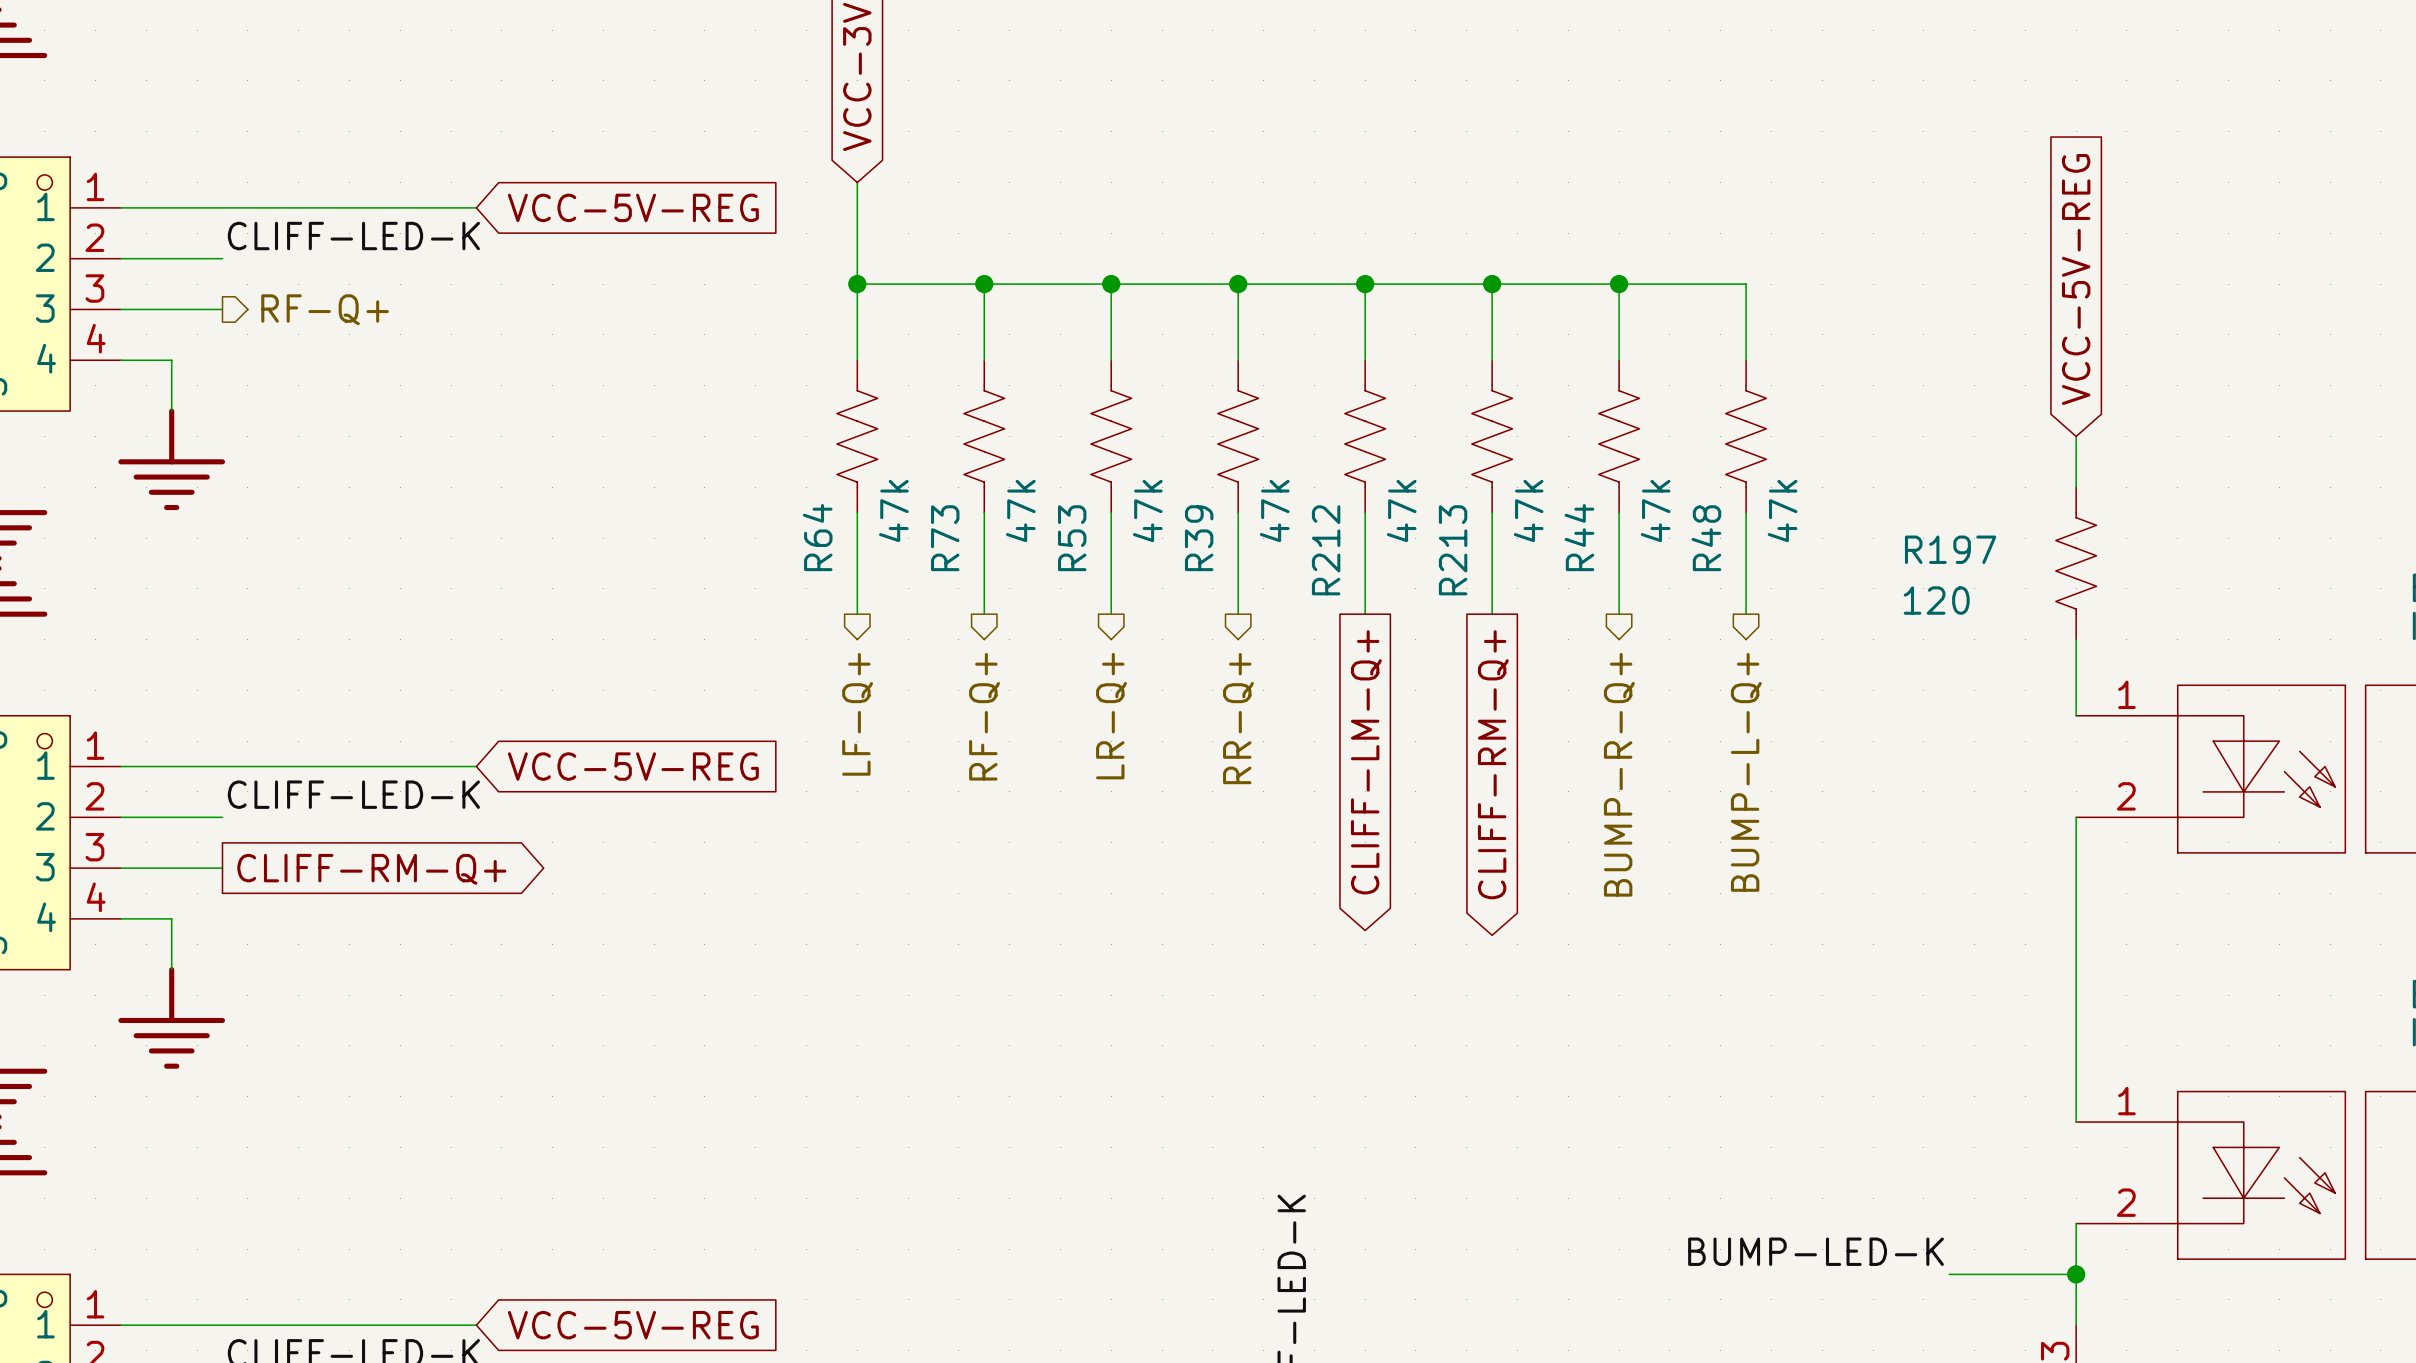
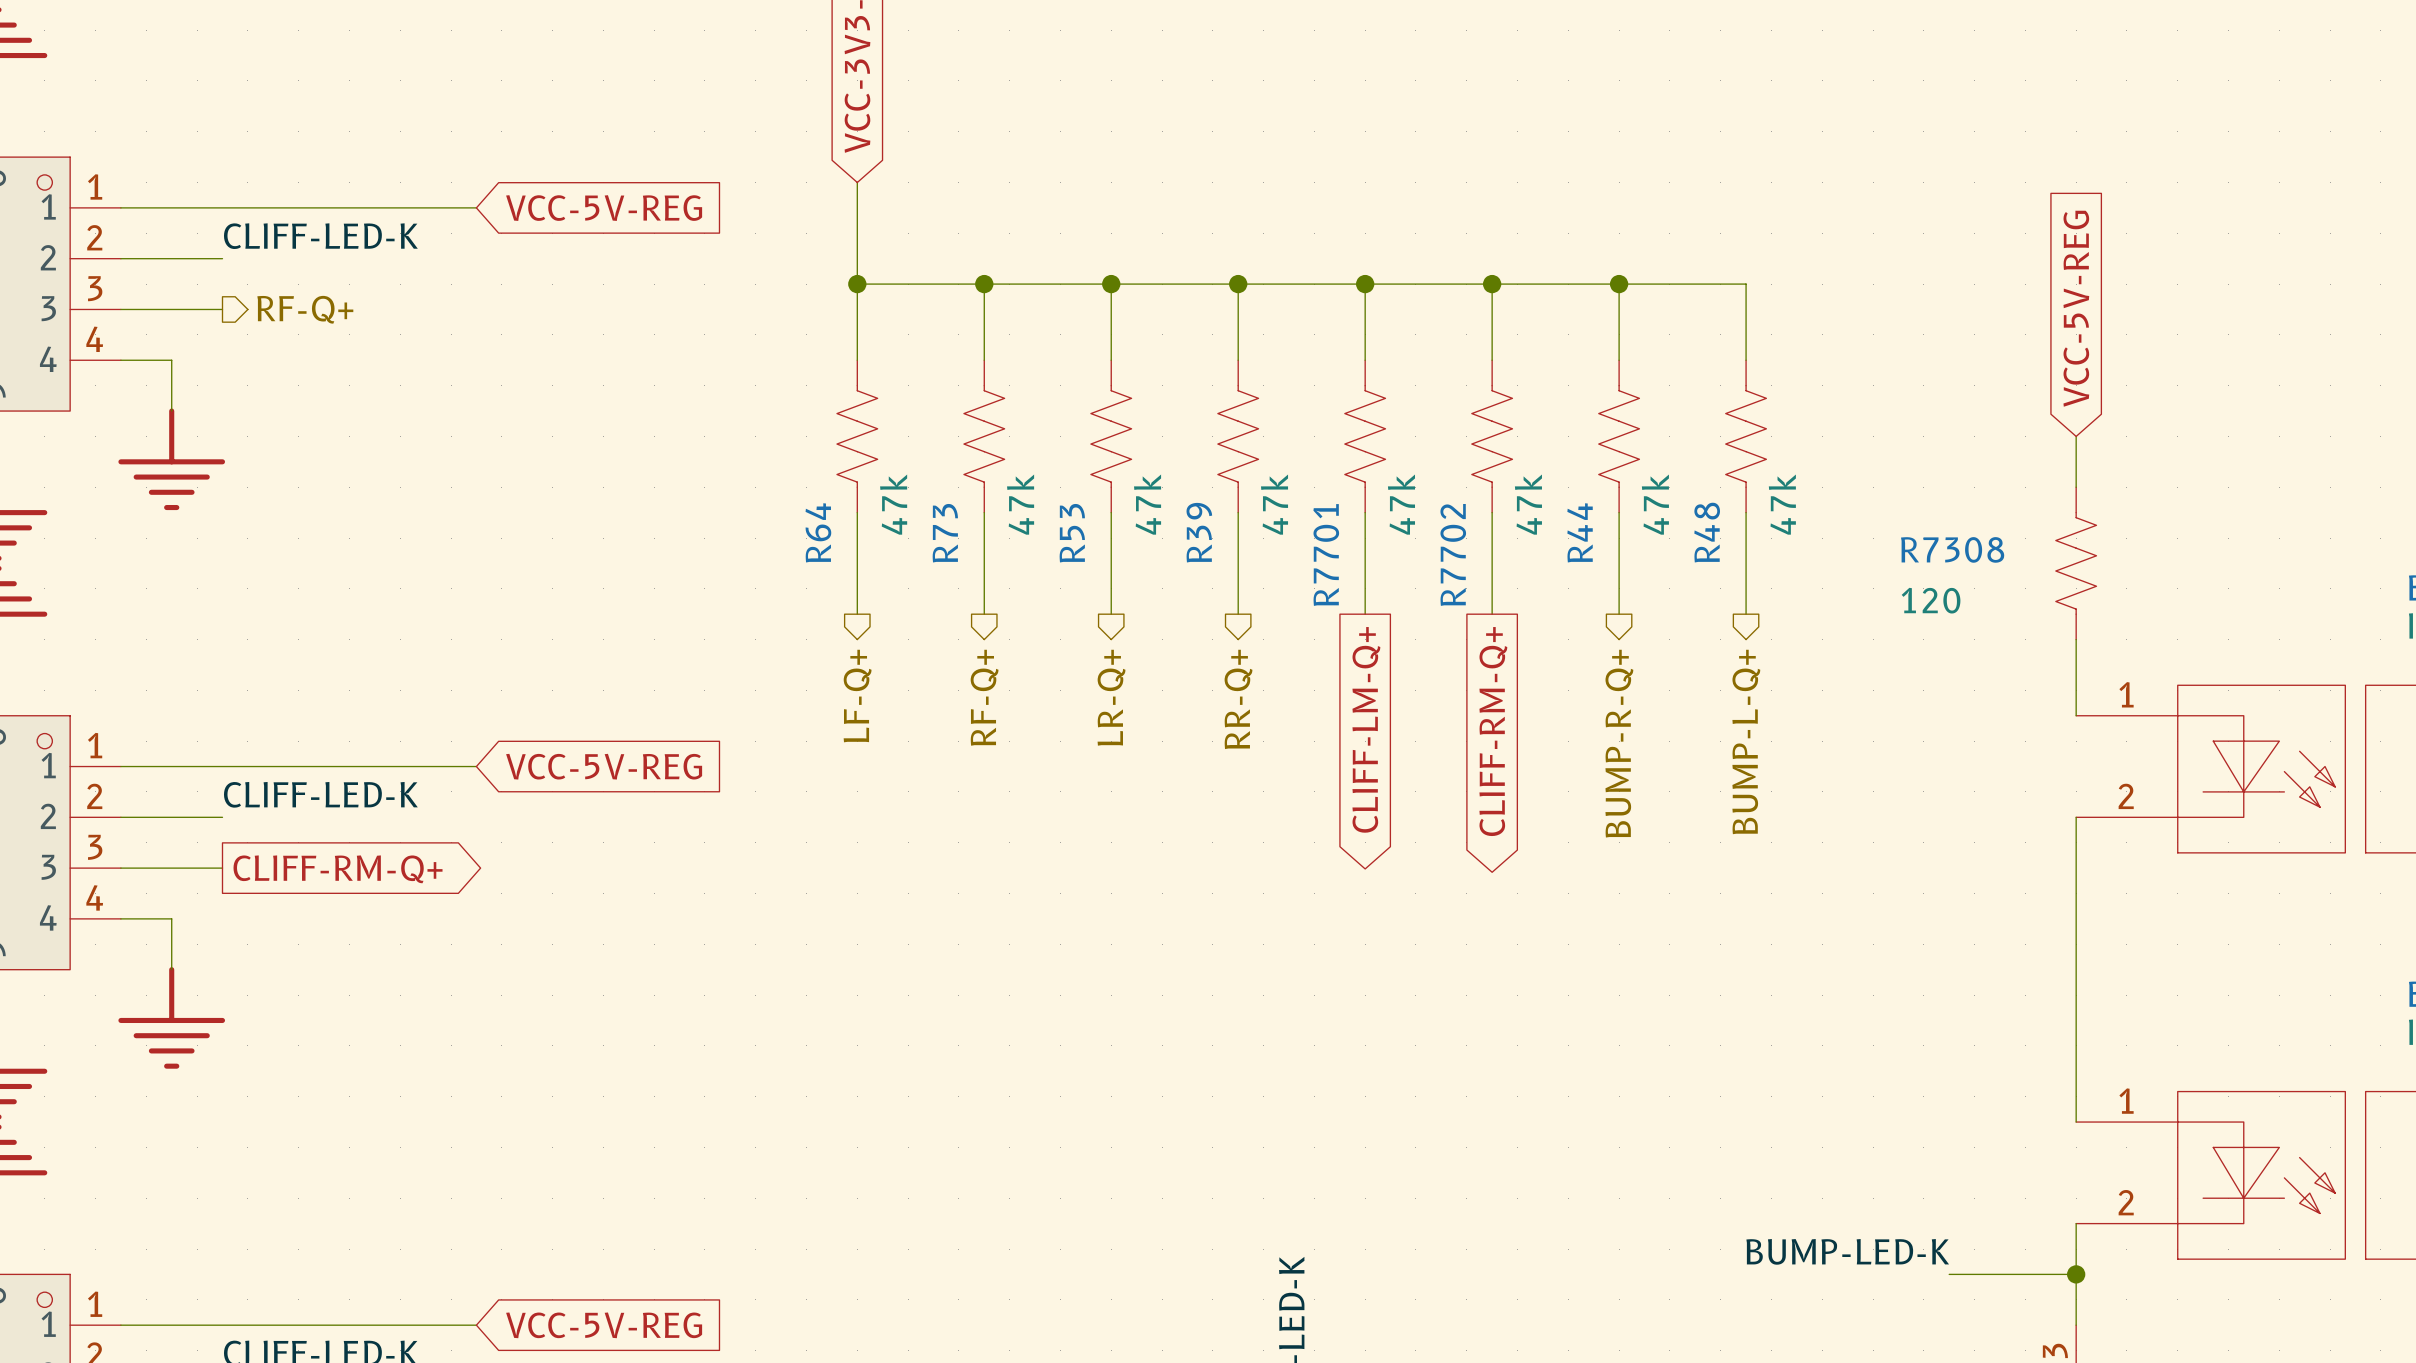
R197 name: R197 (1950, 549) -> R7308 (1952, 549)
R212 name: R212 (1326, 550) -> R7701 (1326, 555)
R213 name: R213 (1453, 550) -> R7702 (1453, 554)

